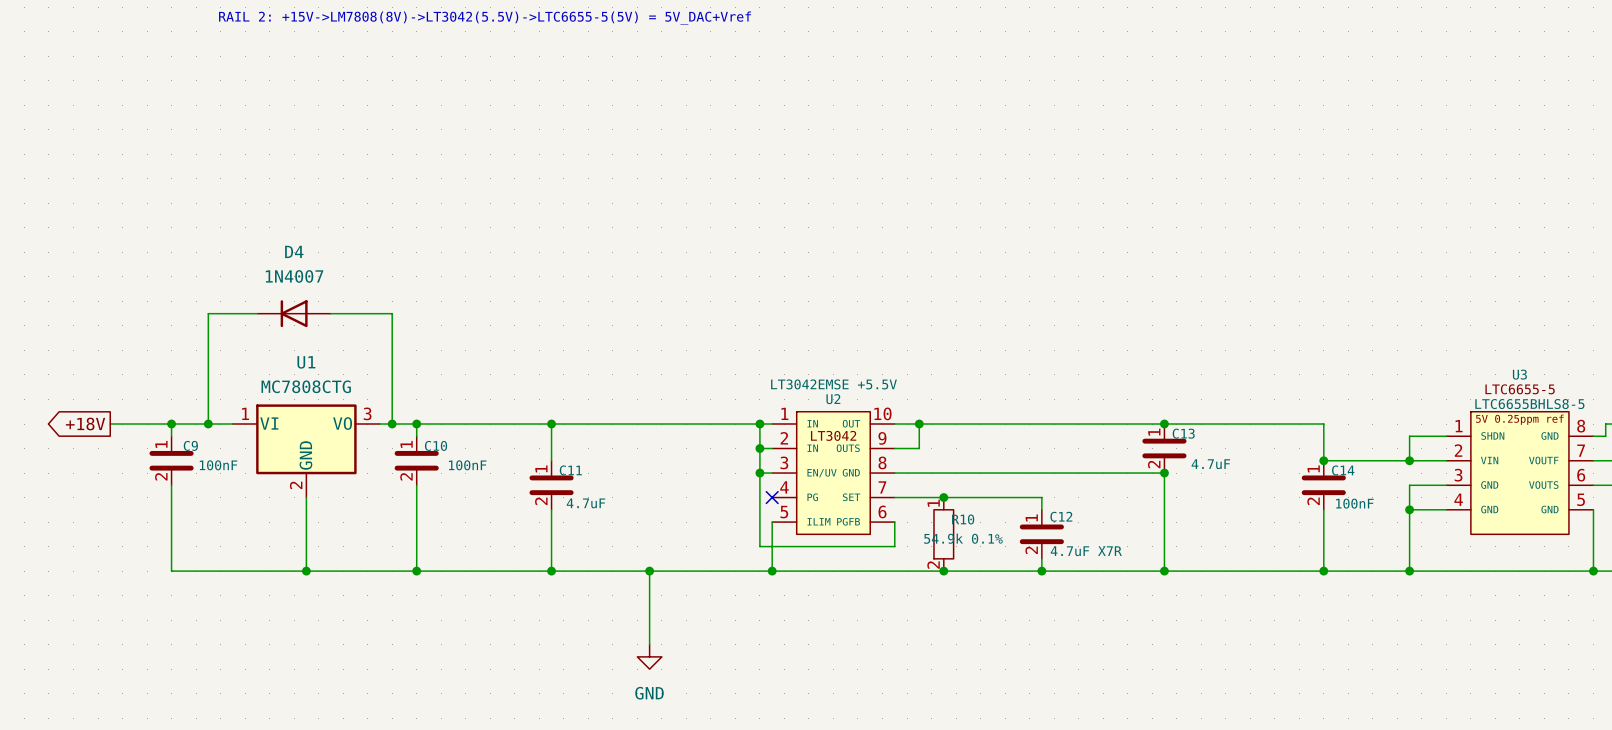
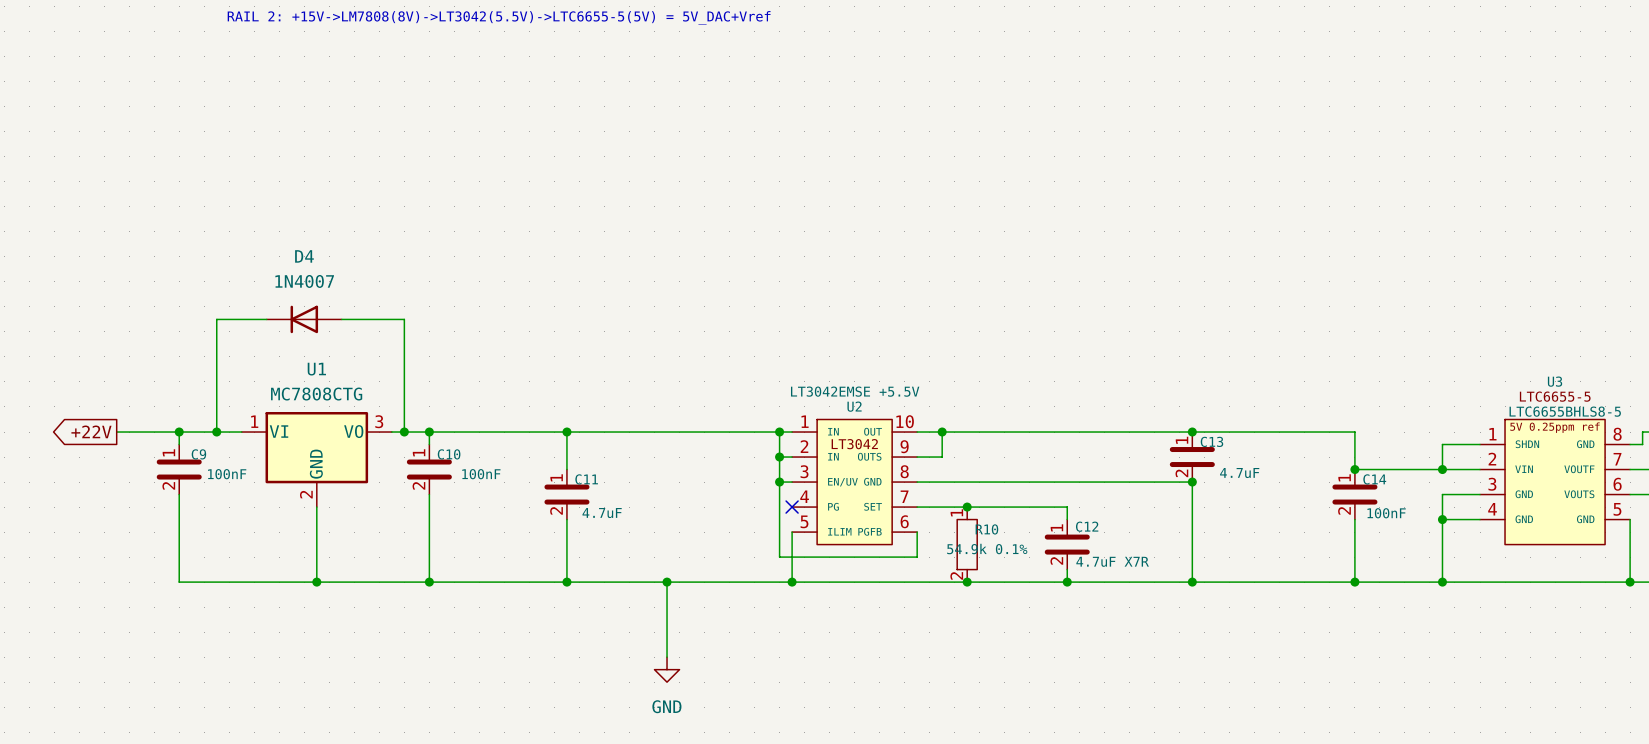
global label: +18V (85, 424) -> +22V (91, 431)

